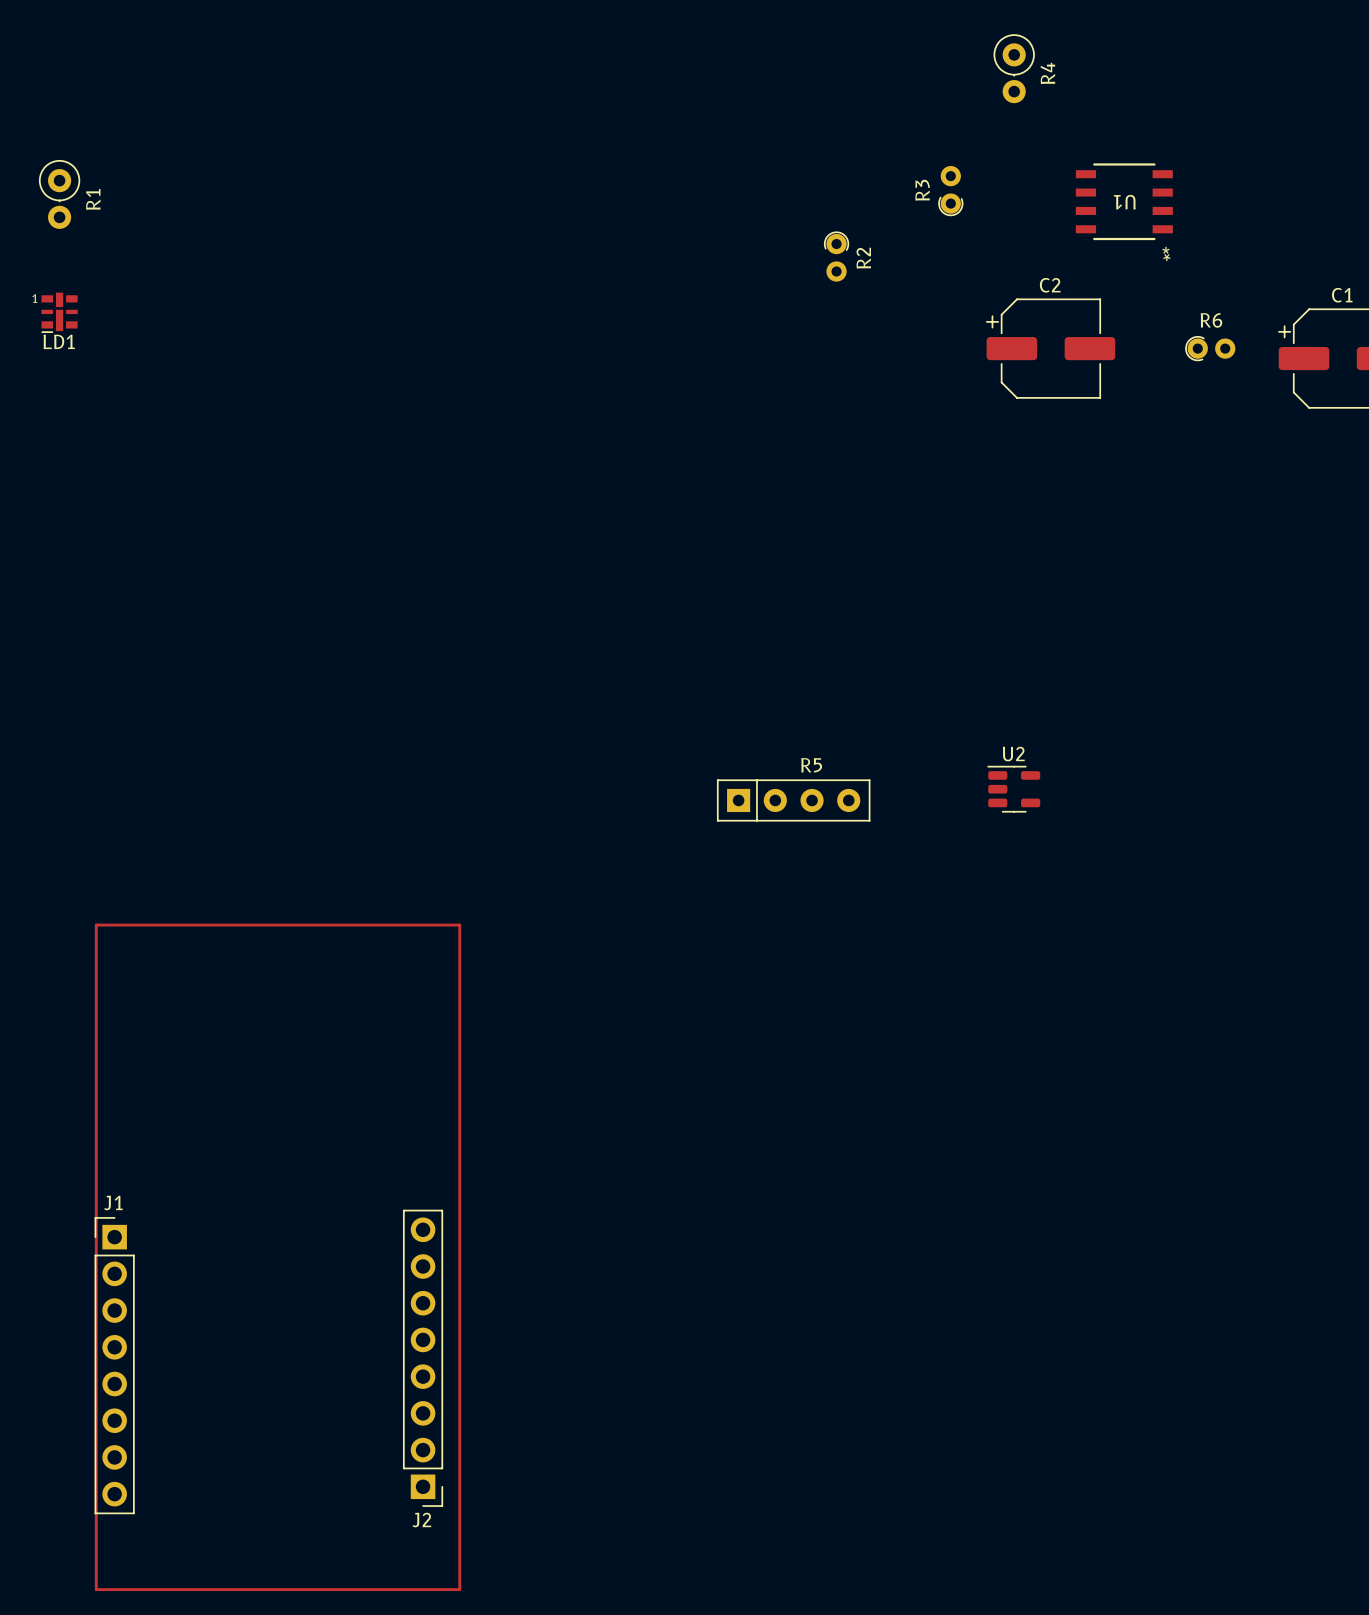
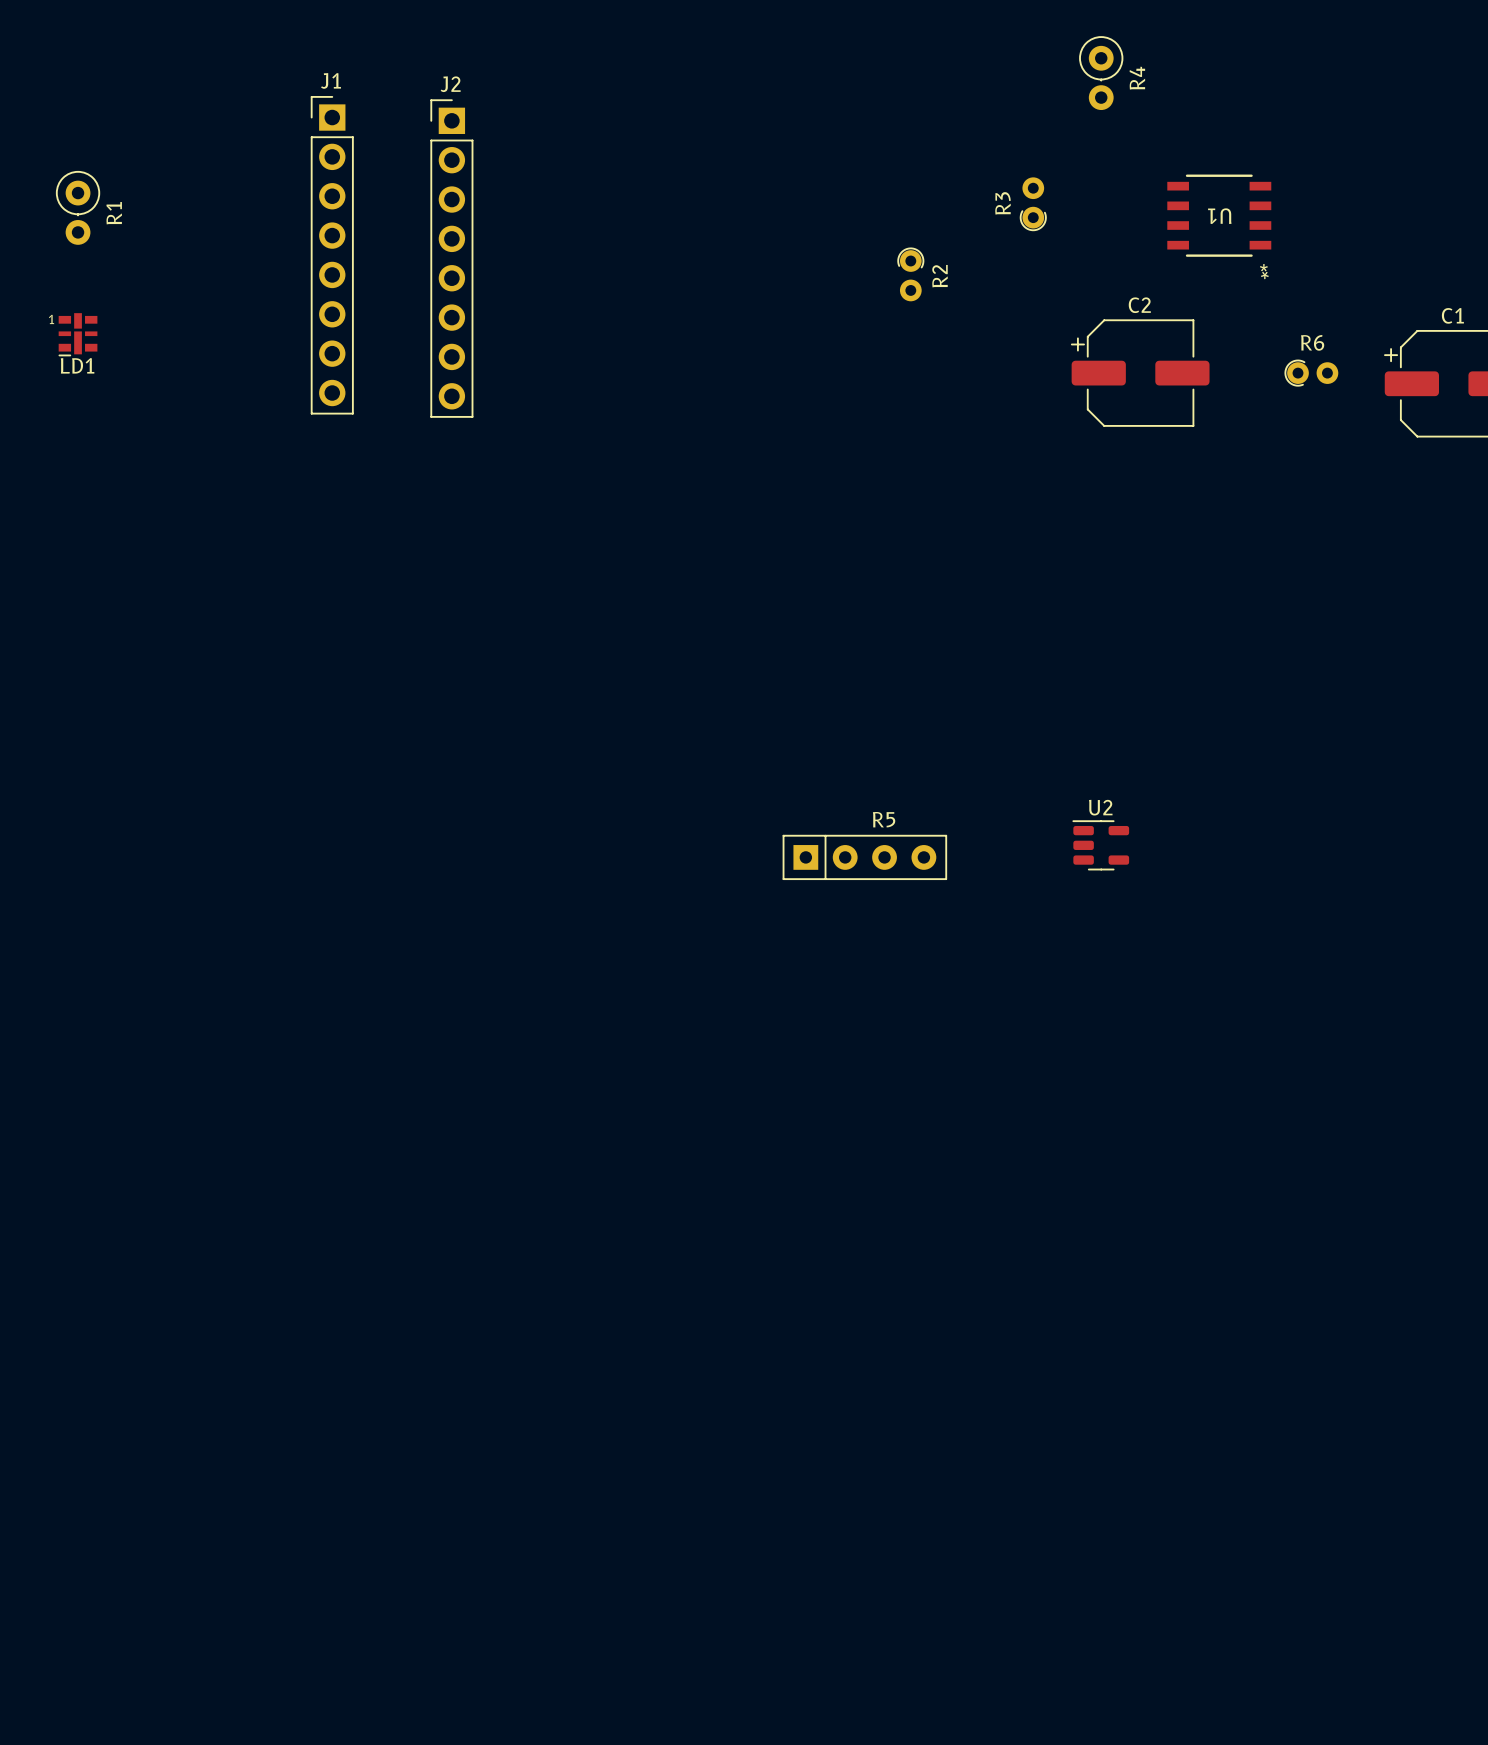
top track: (96, 925) (459, 925) (459, 1589) (96, 1589) (96, 925) -> none
J2 rotation: 0° (423, 1358) -> 180° (451, 258)
J2 position: (423, 1358) -> (451, 258)
J1 position: (114, 1365) -> (332, 255)

